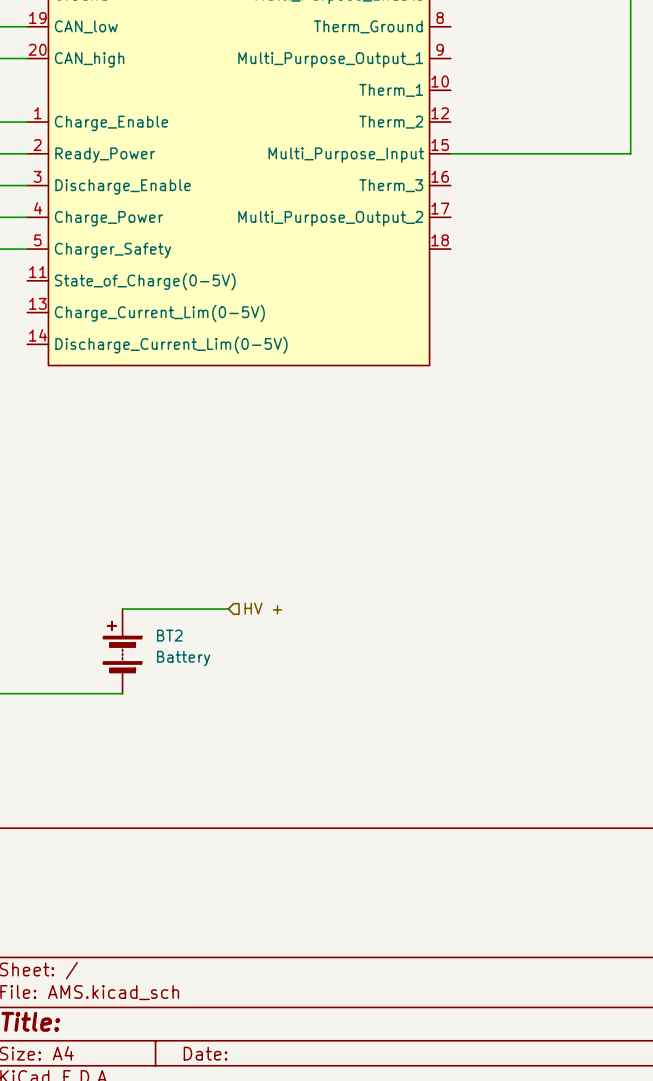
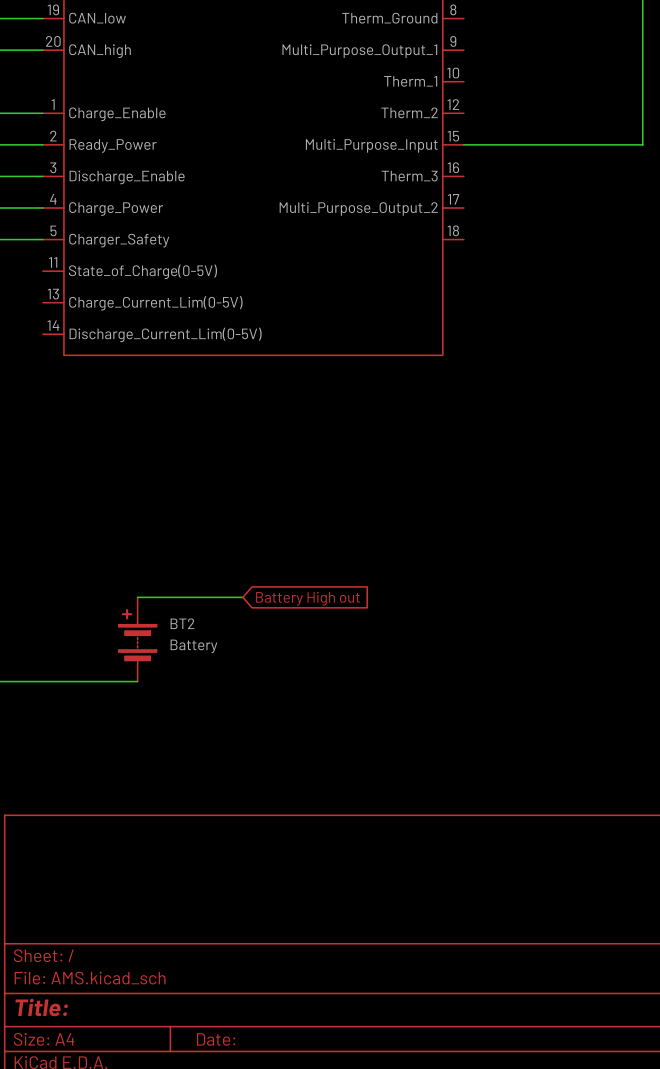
hierarchical label: HV + (263, 608) -> none
global label: none -> Battery High out (307, 598)

